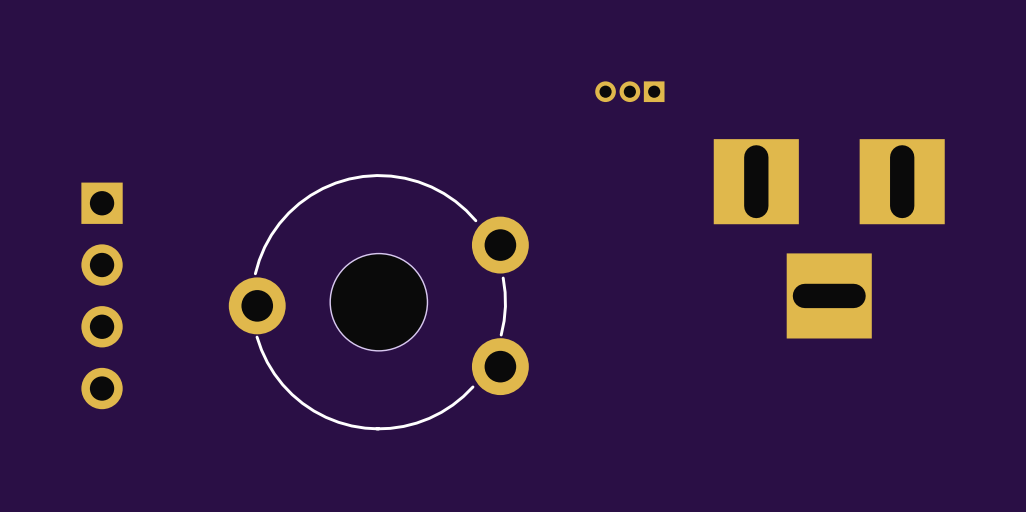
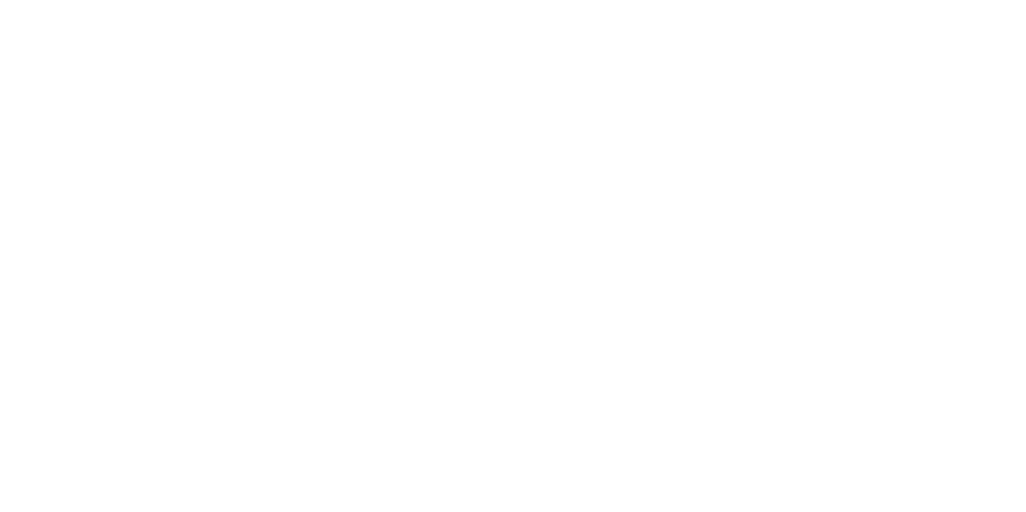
part: (629, 91) -> none
part: (829, 238) -> none
part: (102, 295) -> none
part: (378, 302) -> none

